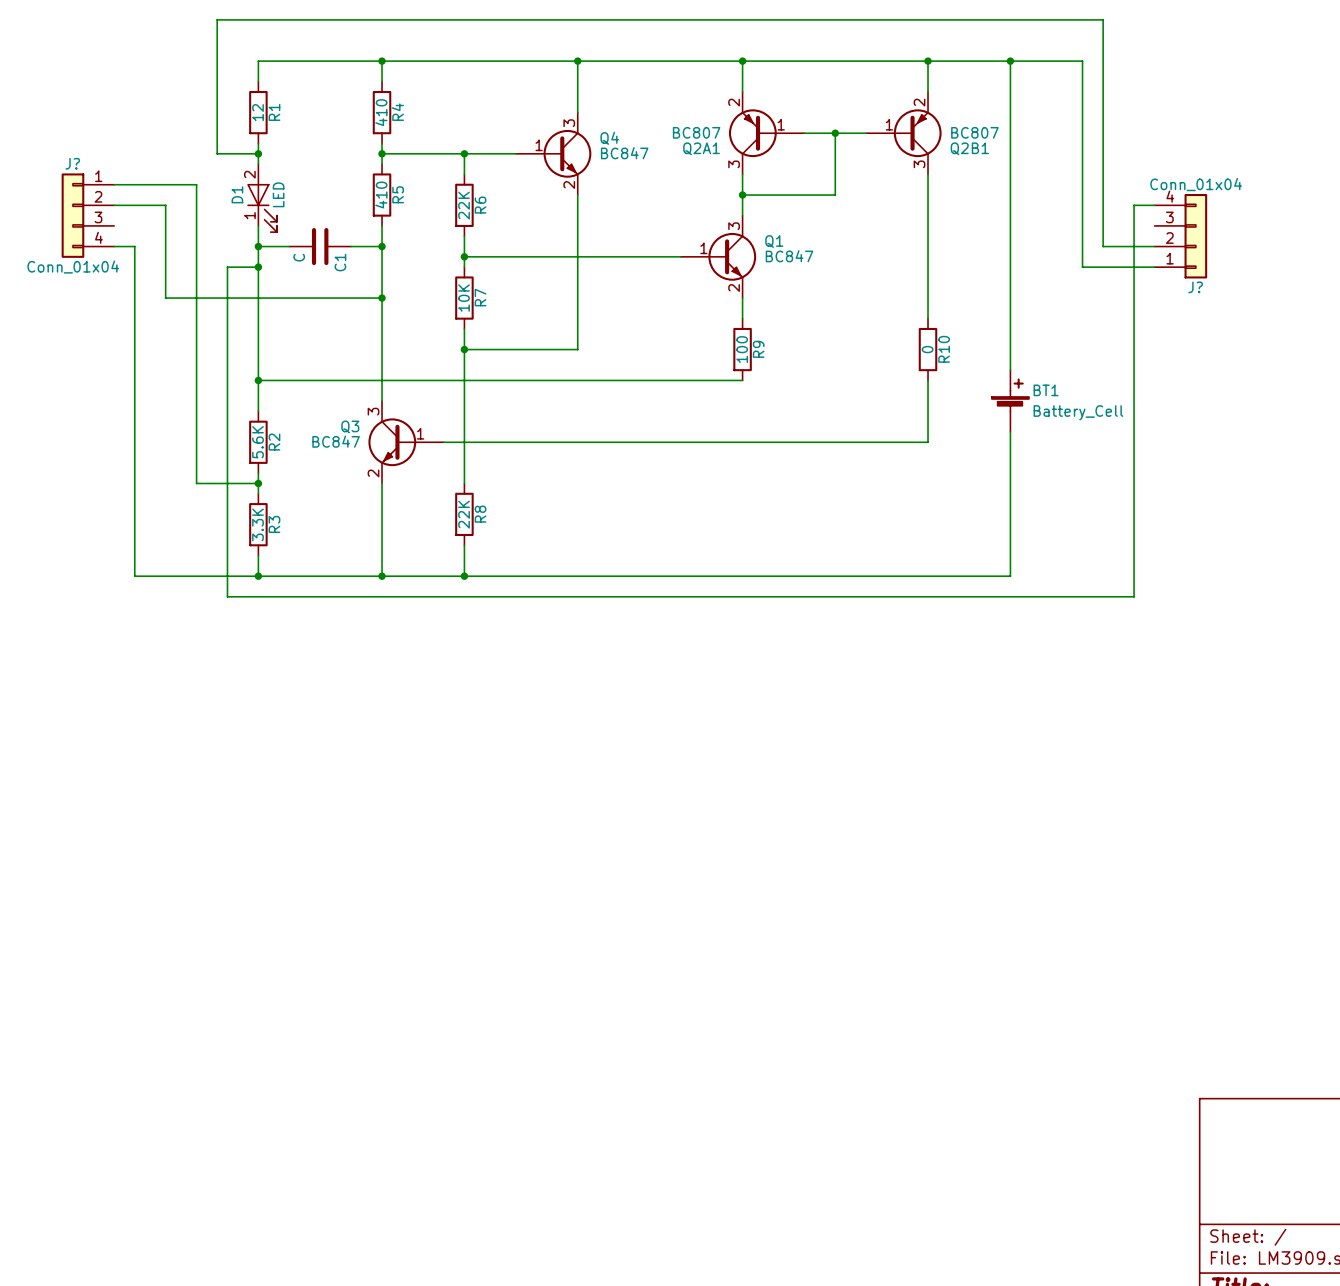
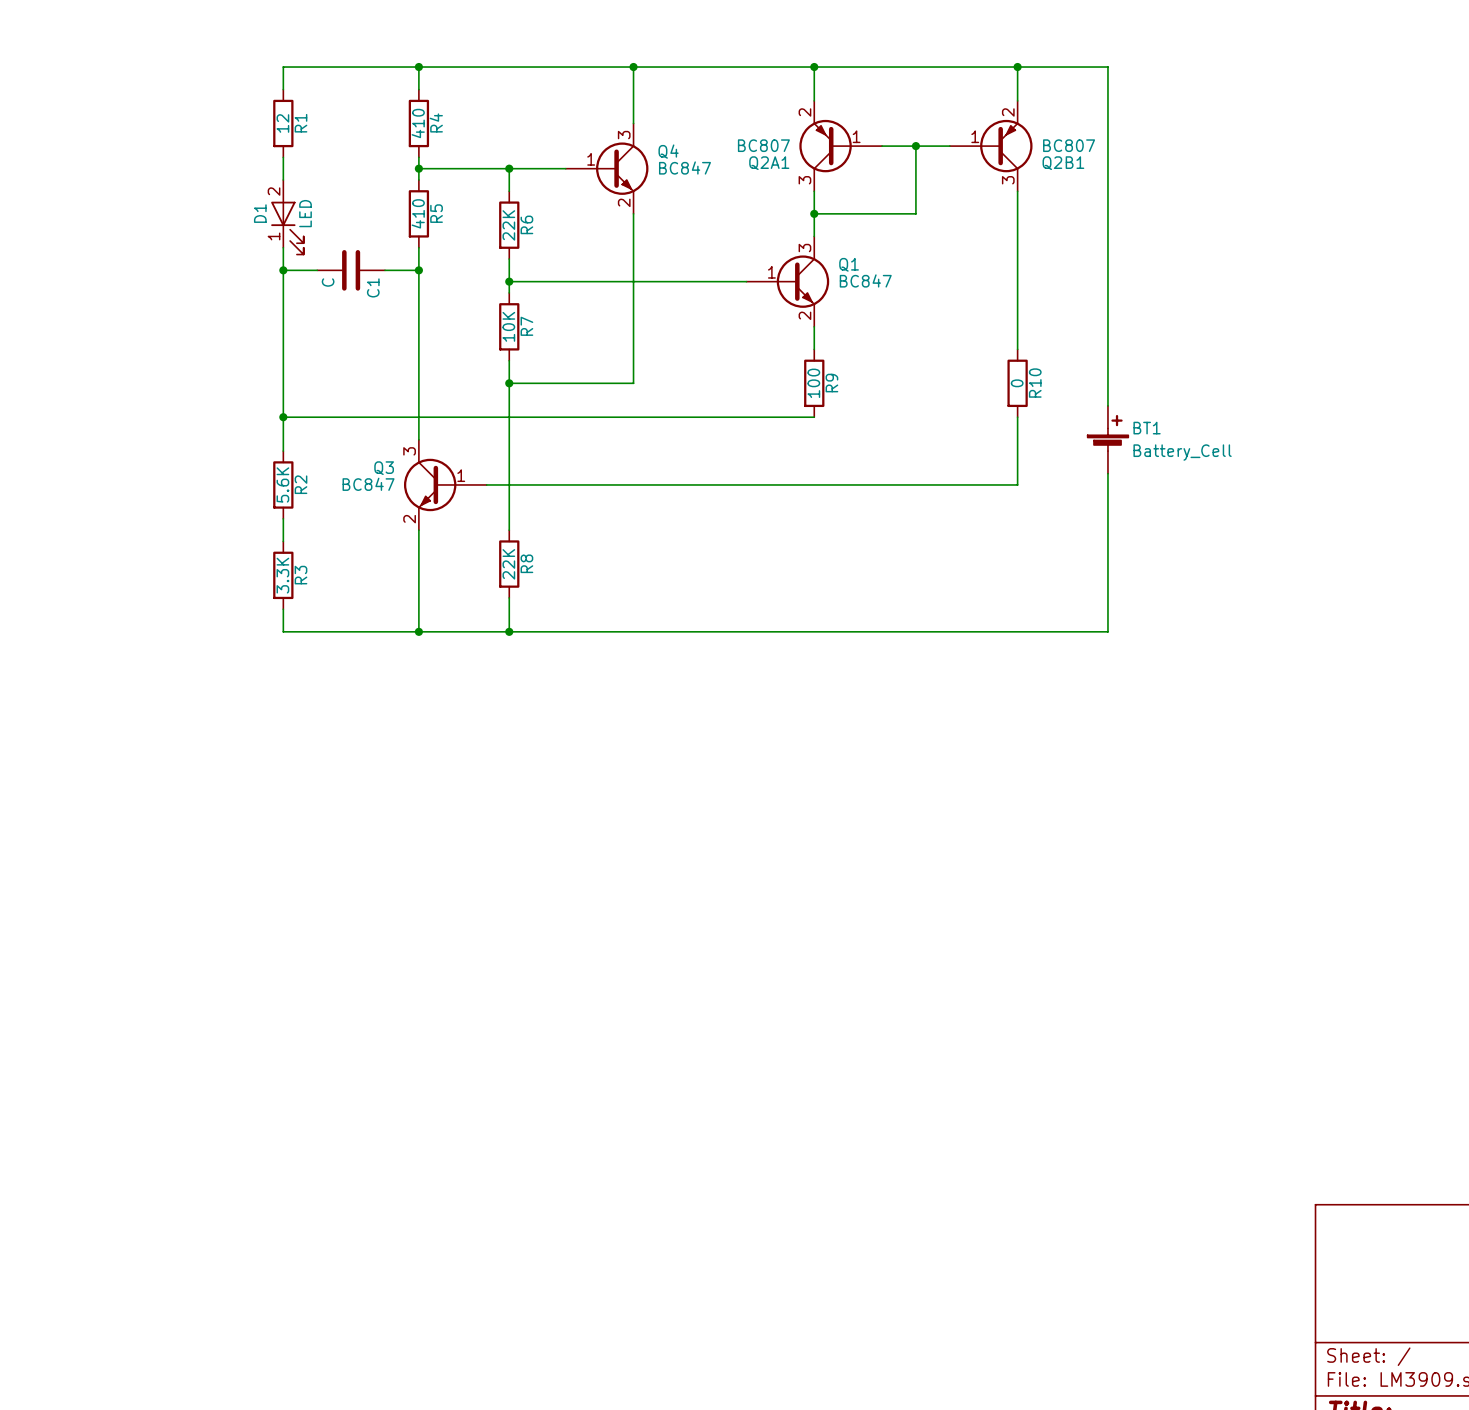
wire: (1010, 61) (1082, 61) (1082, 267) (1154, 267) -> none
junction: (1010, 61) -> none
wire: (258, 153) (217, 153) (217, 19) (1103, 19) (1103, 246) (1154, 246) -> none
junction: (258, 153) -> none
wire: (114, 184) (196, 184) (196, 483) (258, 483) -> none
wire: (114, 205) (165, 205) (165, 298) (382, 298) -> none
wire: (1154, 205) (1134, 205) (1134, 596) (227, 596) (227, 267) (258, 267) -> none
J?: Conn_01x04 (87, 215) -> none
J?: Conn_01x04 (1180, 236) -> none
wire: (114, 246) (134, 246) (134, 576) (258, 576) -> none
junction: (258, 267) -> none
junction: (382, 298) -> none
junction: (258, 483) -> none
junction: (258, 576) -> none

